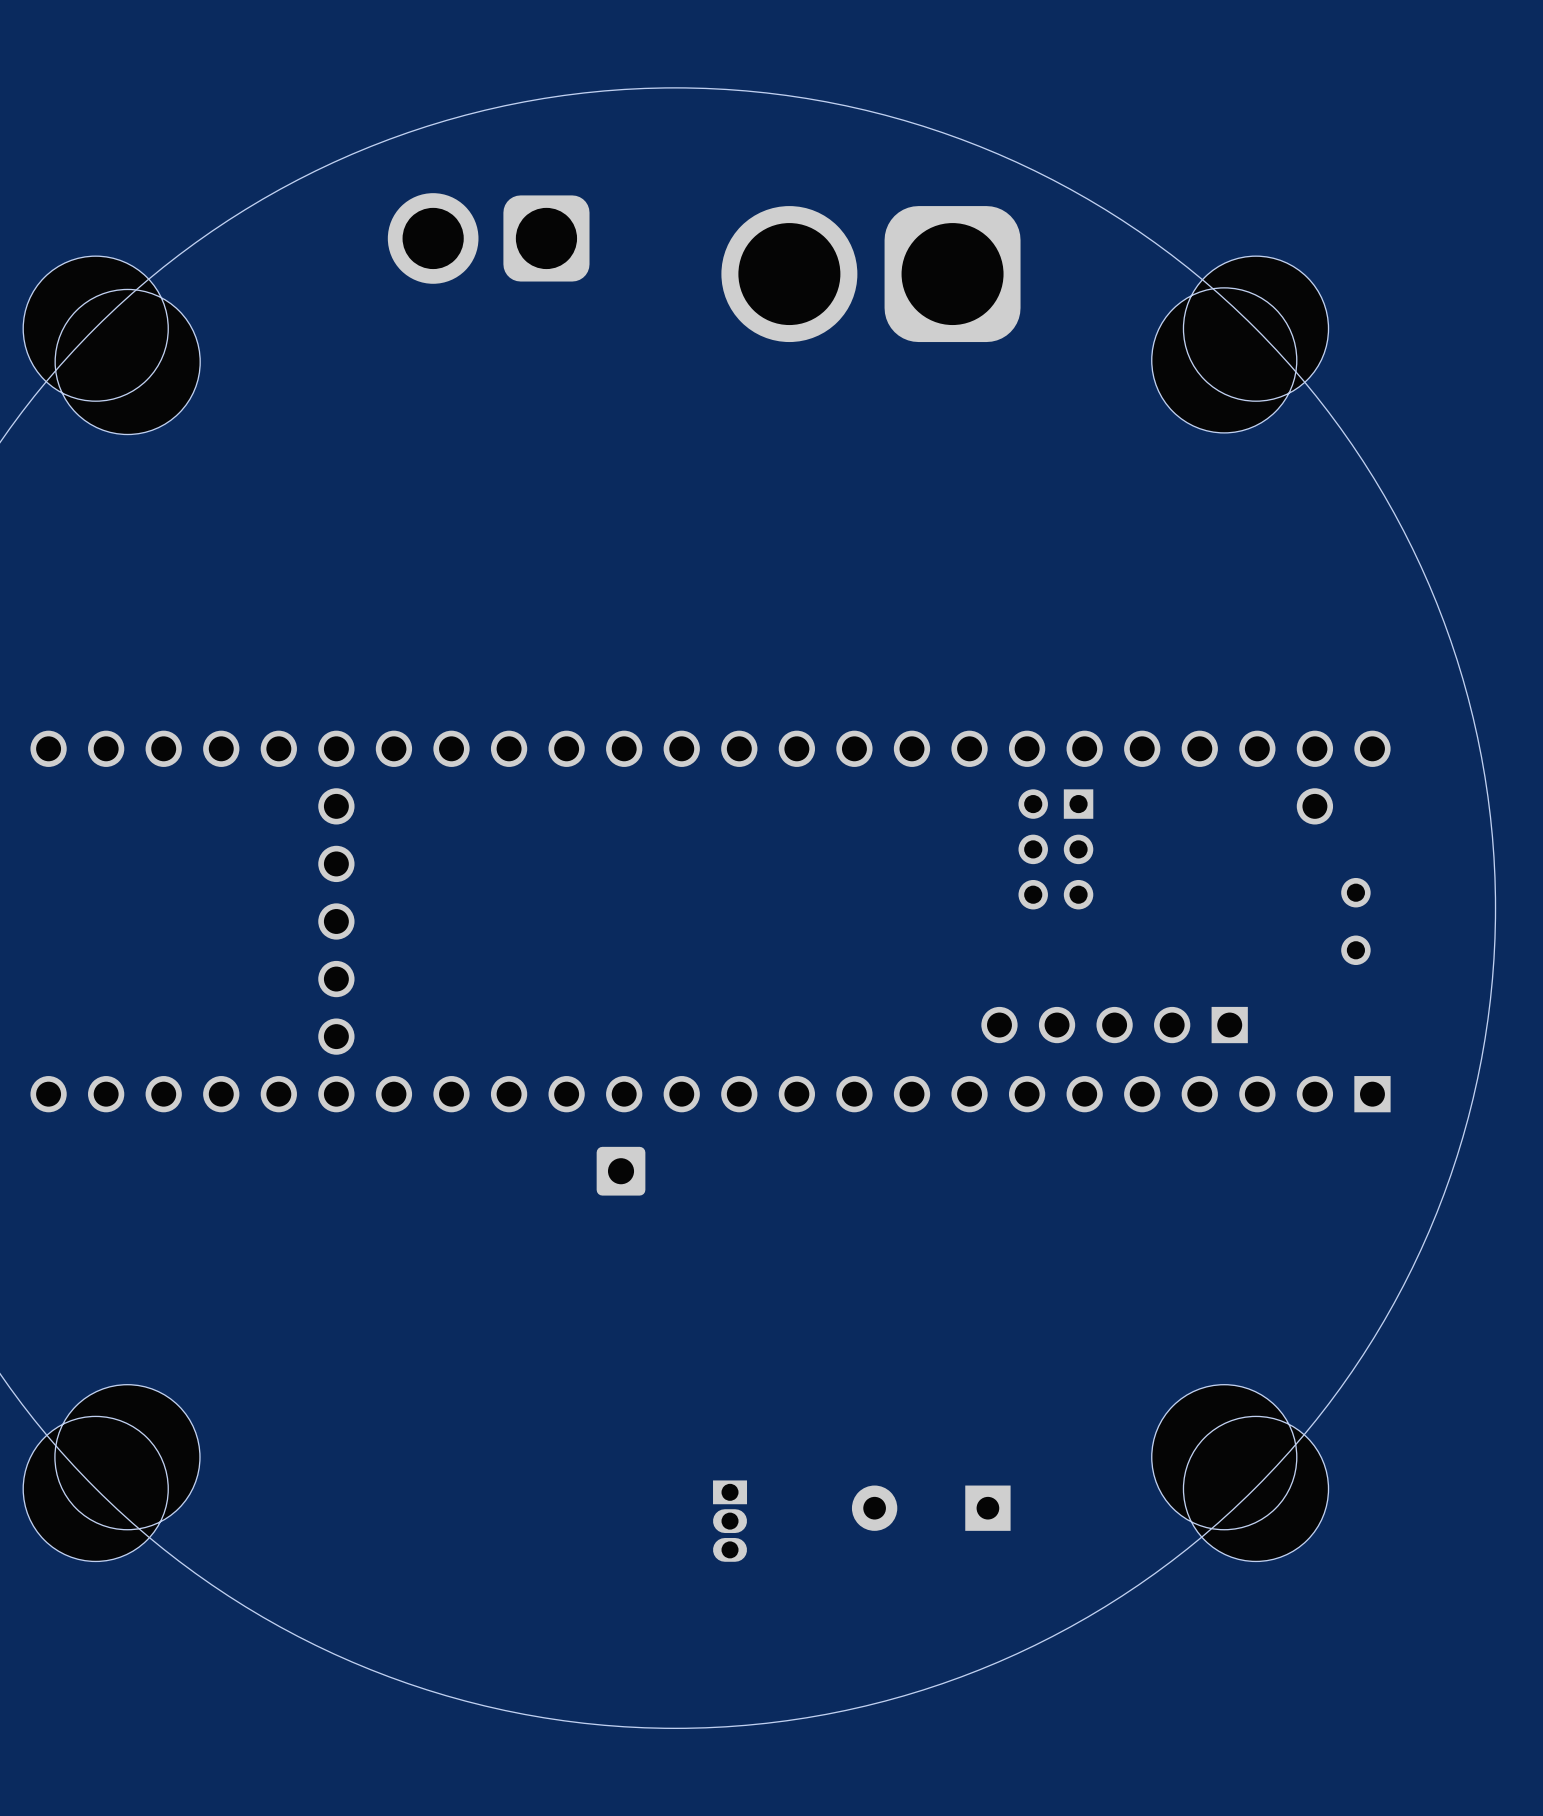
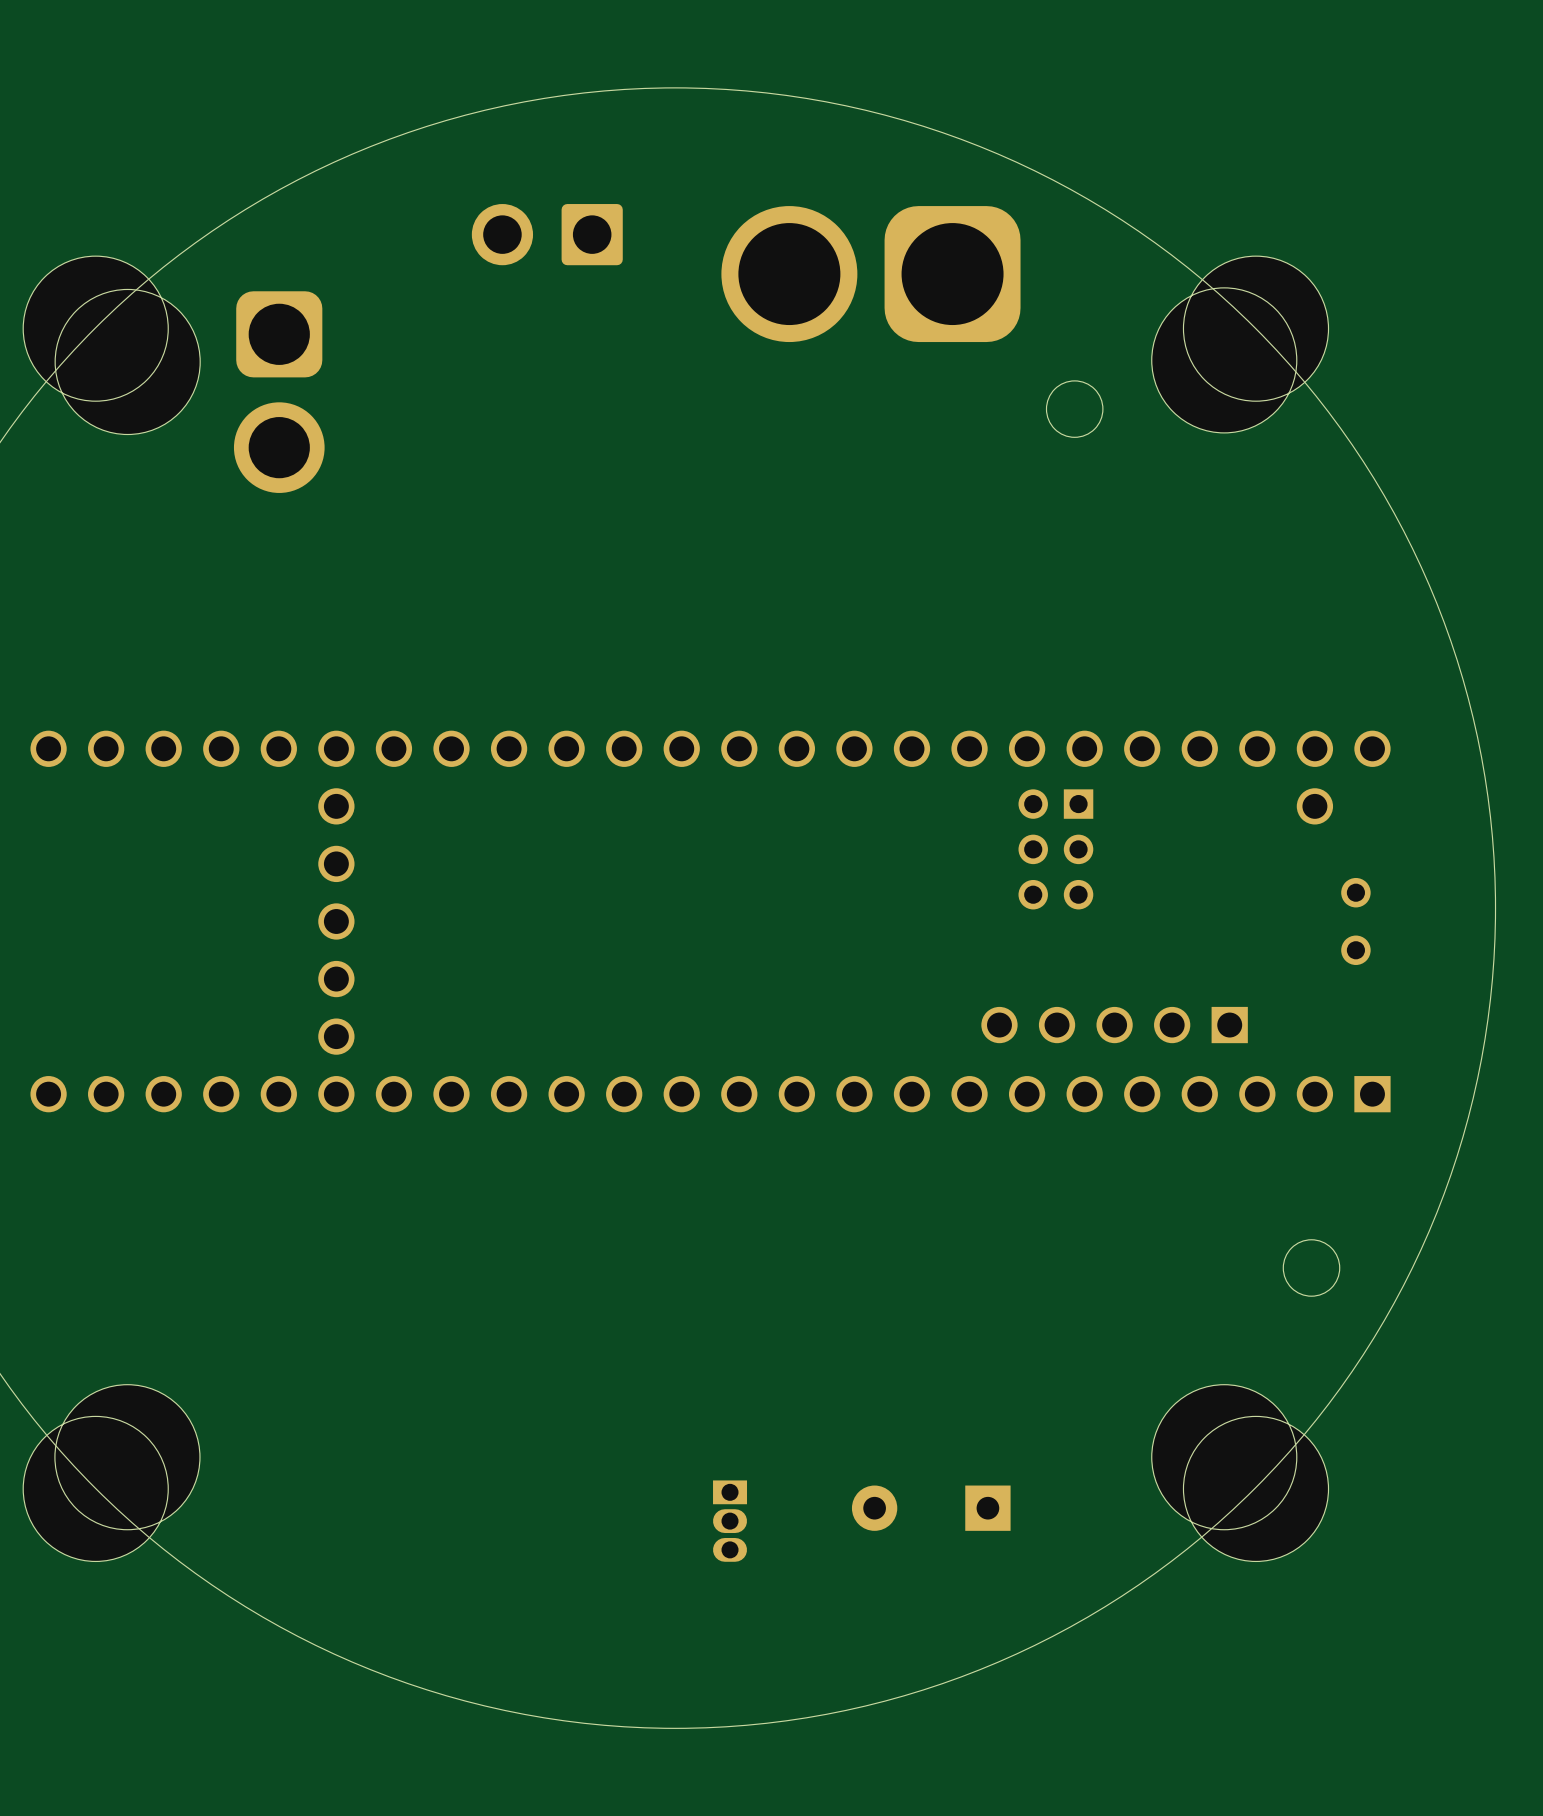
part: none -> (547, 234)
part rotation: 0° (488, 238) -> 90° counterclockwise (279, 392)
part position: (488, 238) -> (279, 392)
round board edge: none -> [1045, 380, 1104, 438]
part: (621, 1171) -> none
round board edge: none -> [1282, 1239, 1341, 1297]

